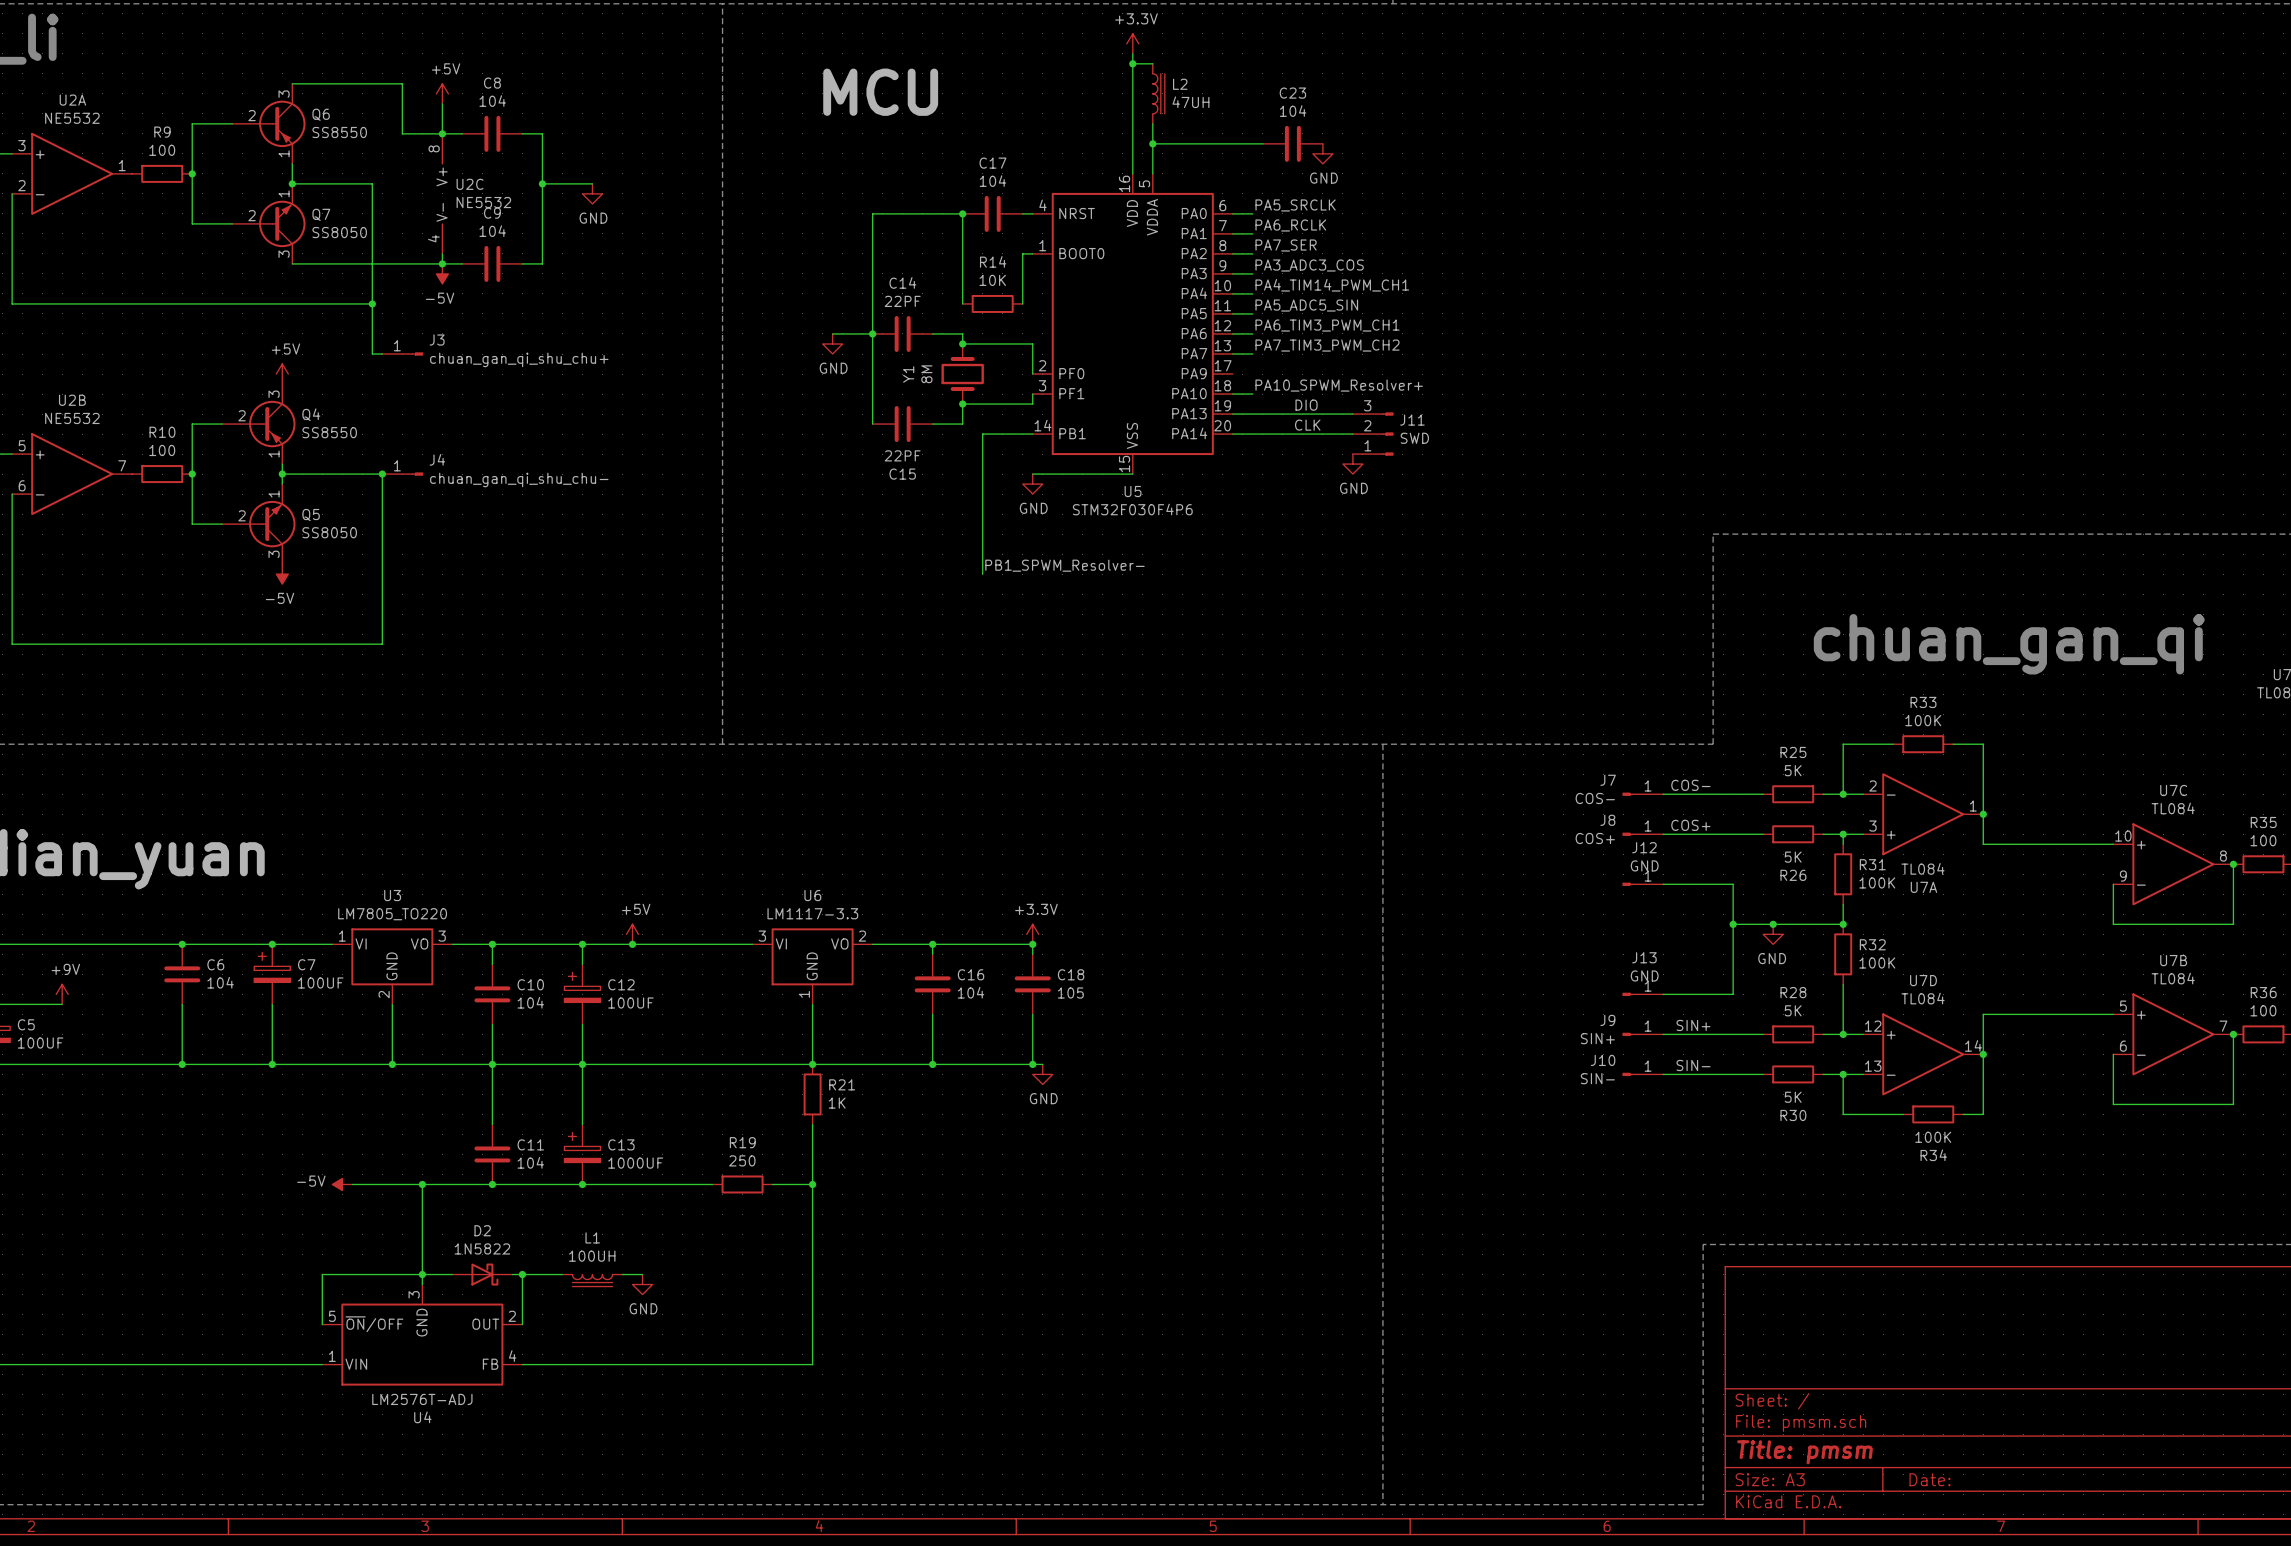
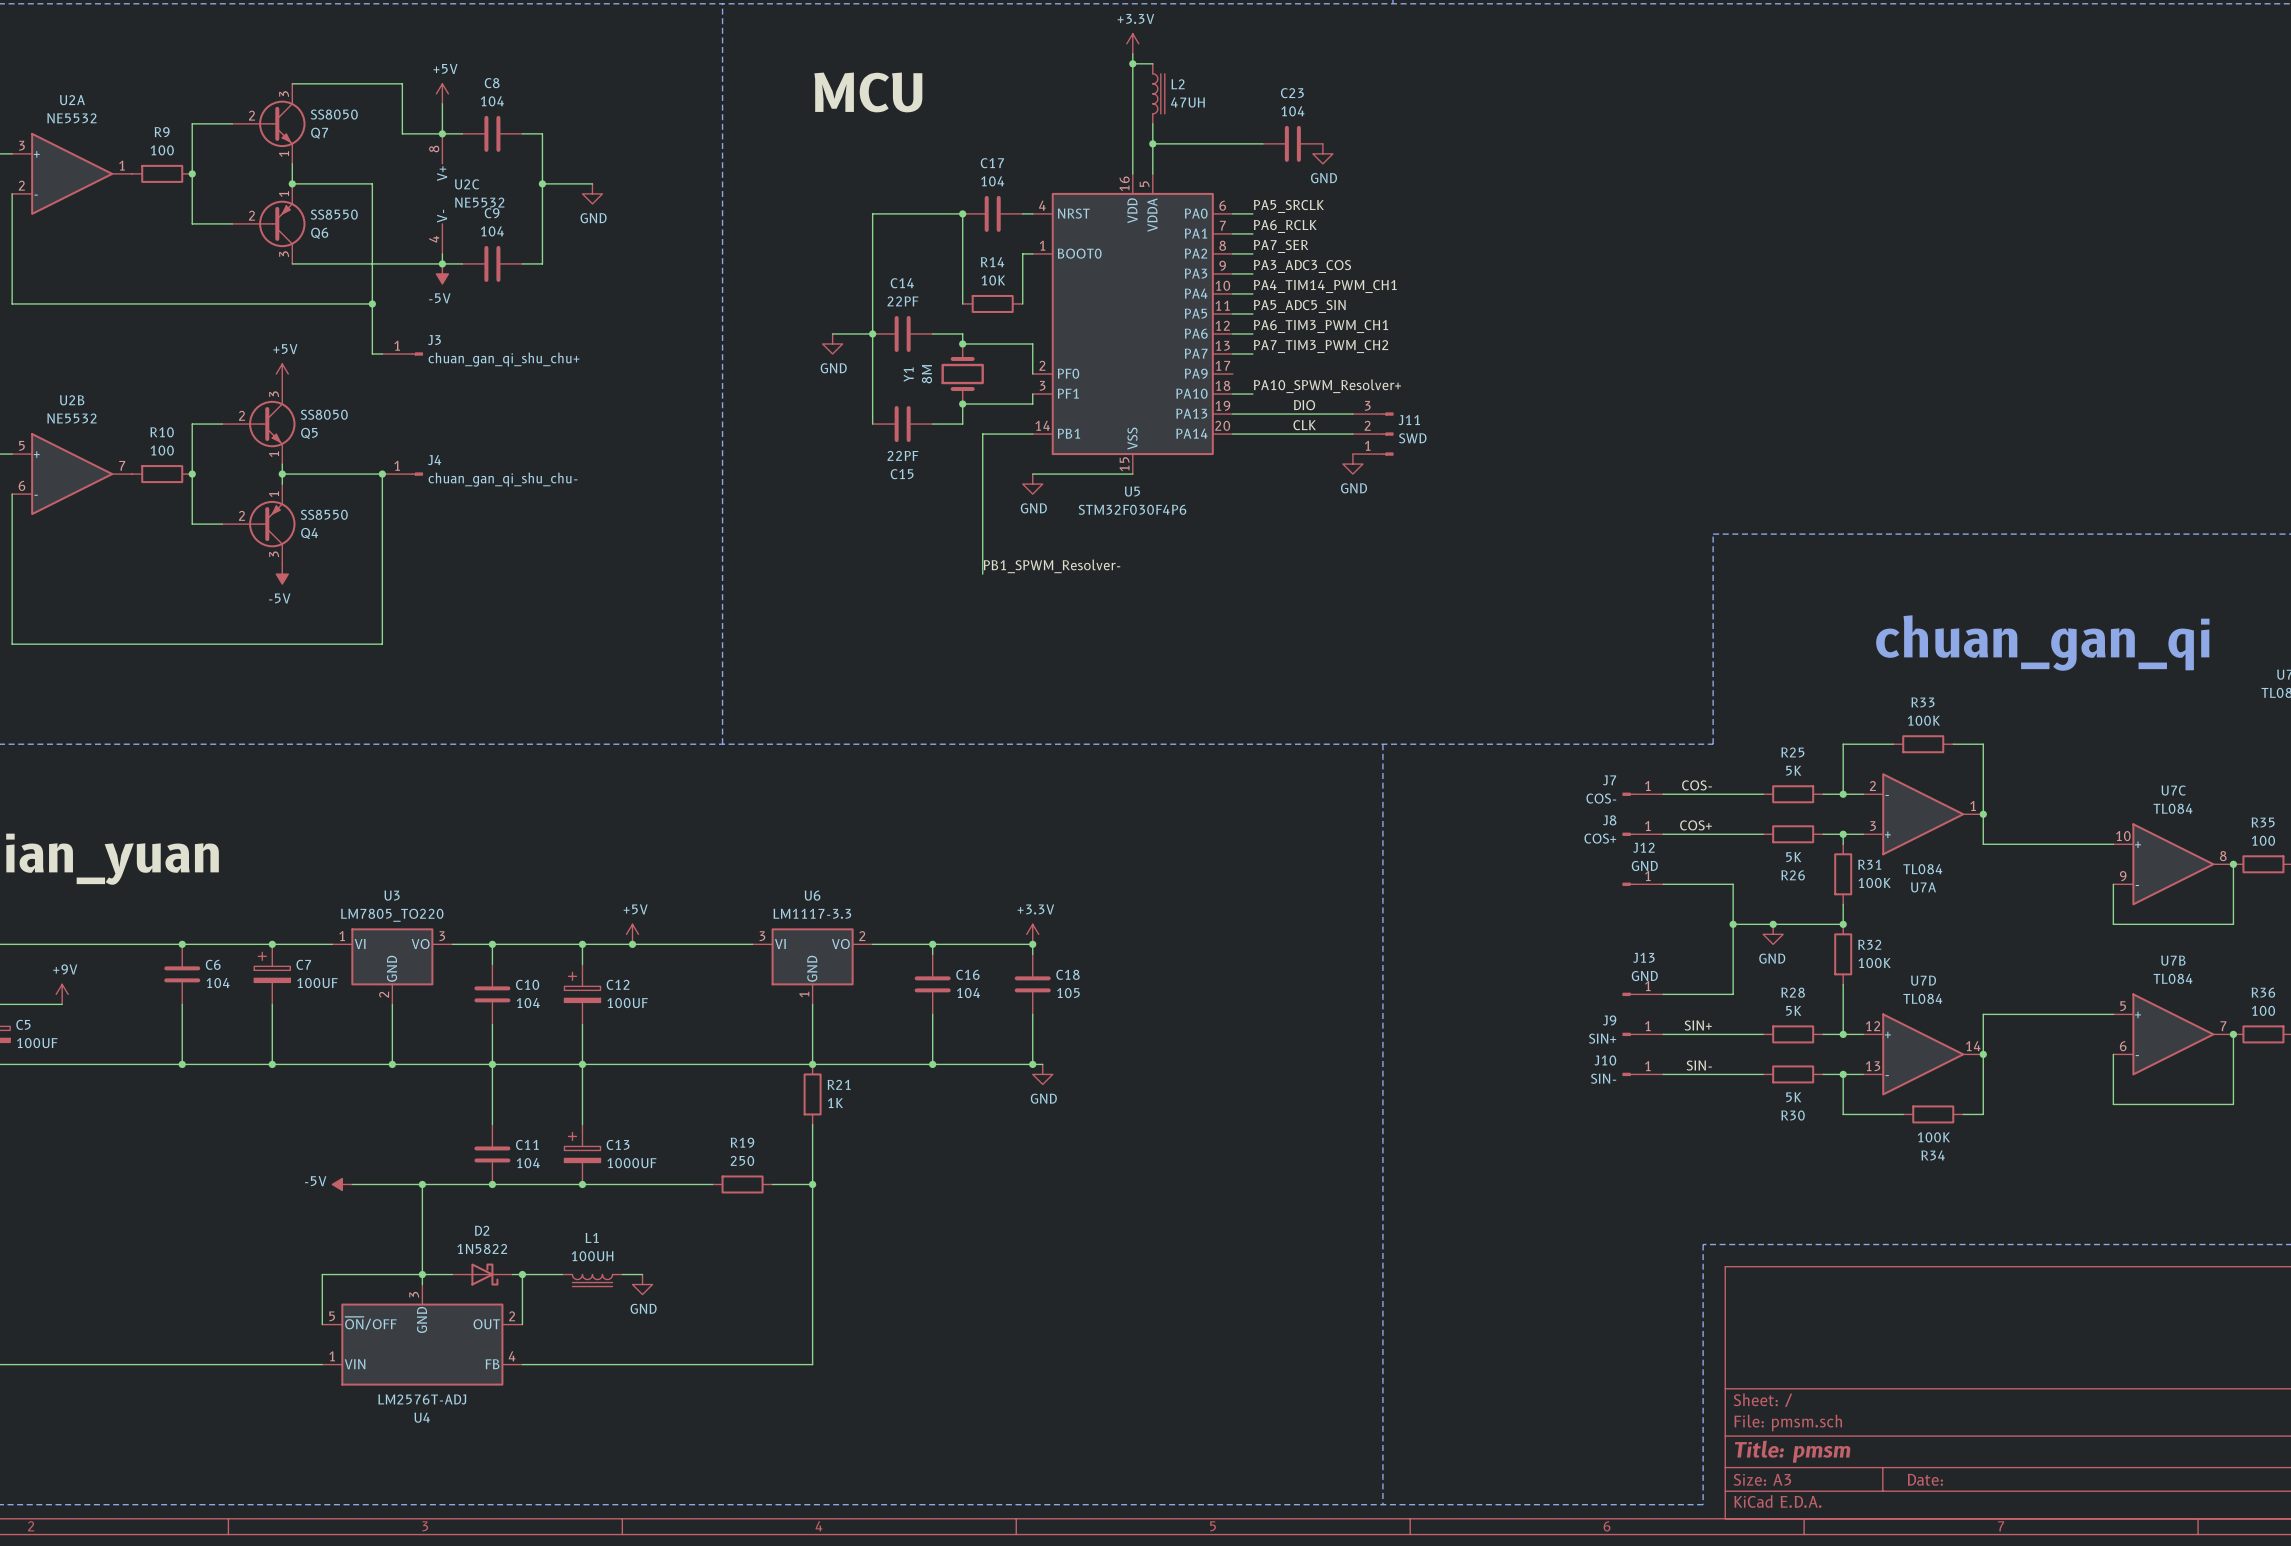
Q6 position: (268, 123) -> (268, 223)
Q6 flip: as is (282, 123) -> up-down (282, 223)
Q7 position: (268, 223) -> (268, 123)
Q7 flip: as is (282, 223) -> up-down (282, 123)
Q4 position: (258, 424) -> (258, 524)
Q4 flip: as is (272, 424) -> up-down (272, 524)
Q5 position: (258, 524) -> (258, 424)
Q5 flip: as is (272, 524) -> up-down (272, 424)

